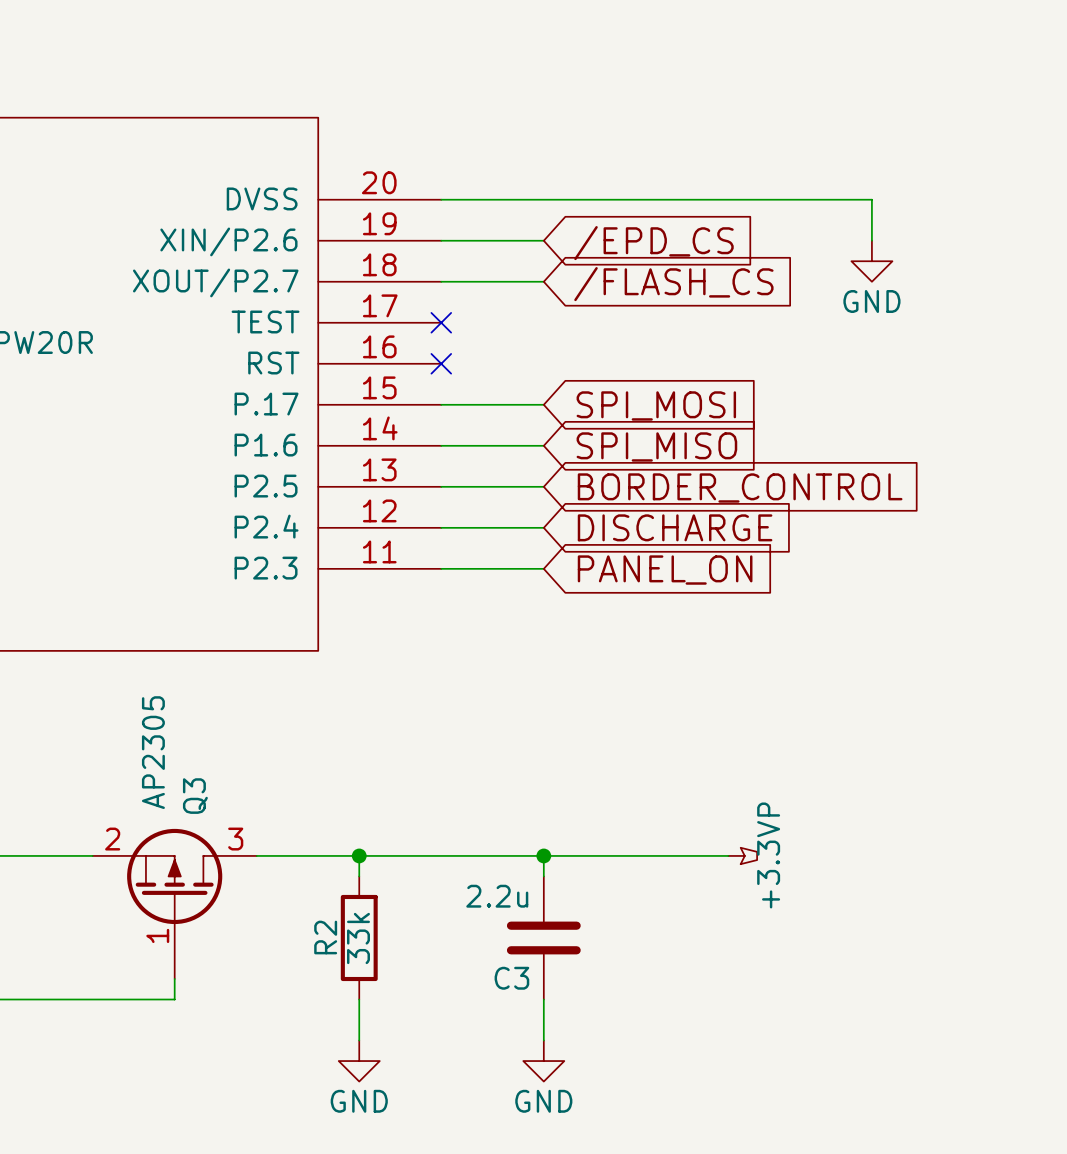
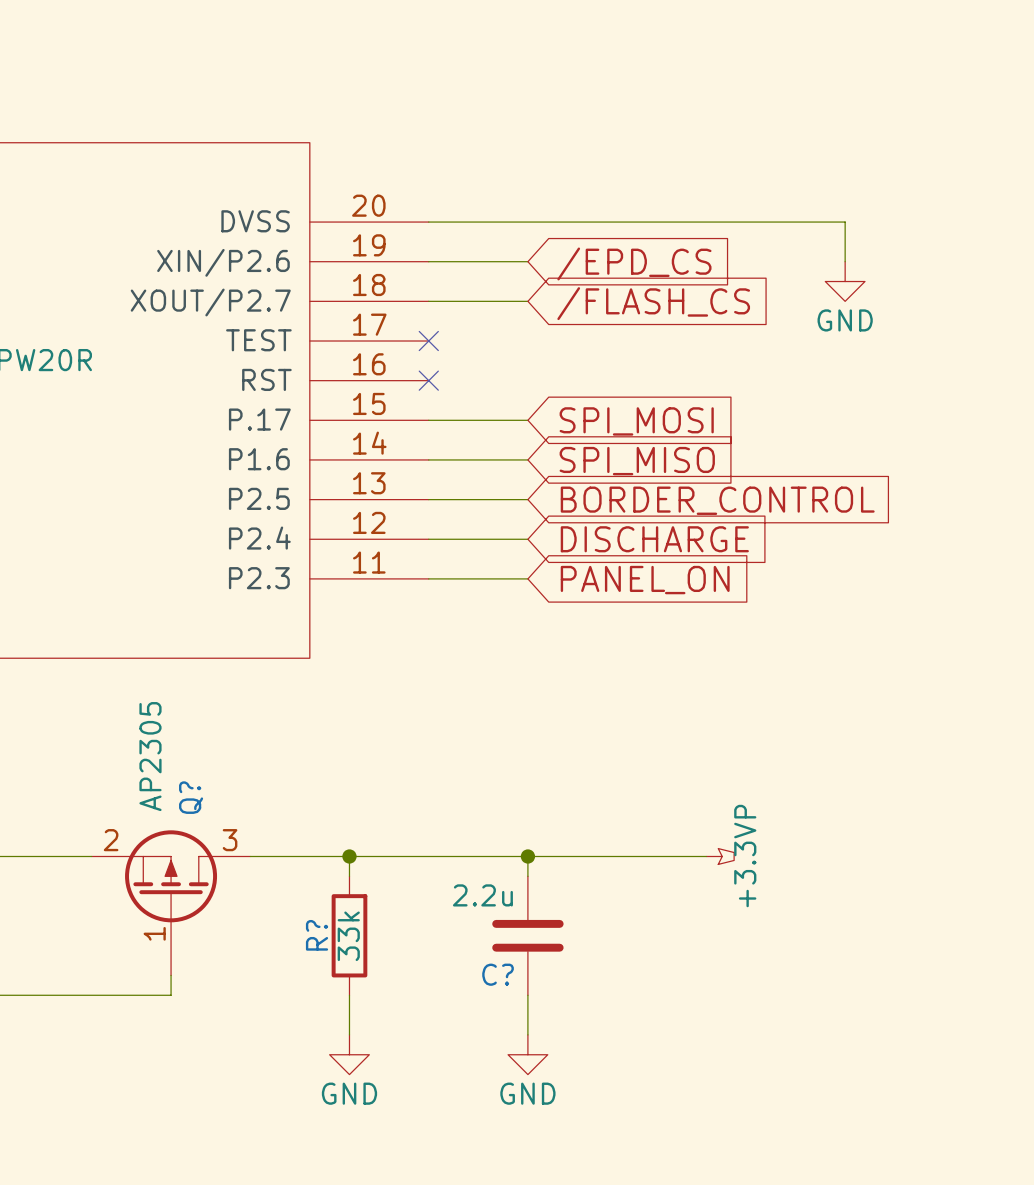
Q3 name: Q3 (195, 796) -> Q? (191, 797)
R2 name: R2 (325, 937) -> R? (317, 935)
C3 name: C3 (511, 978) -> C? (498, 974)

